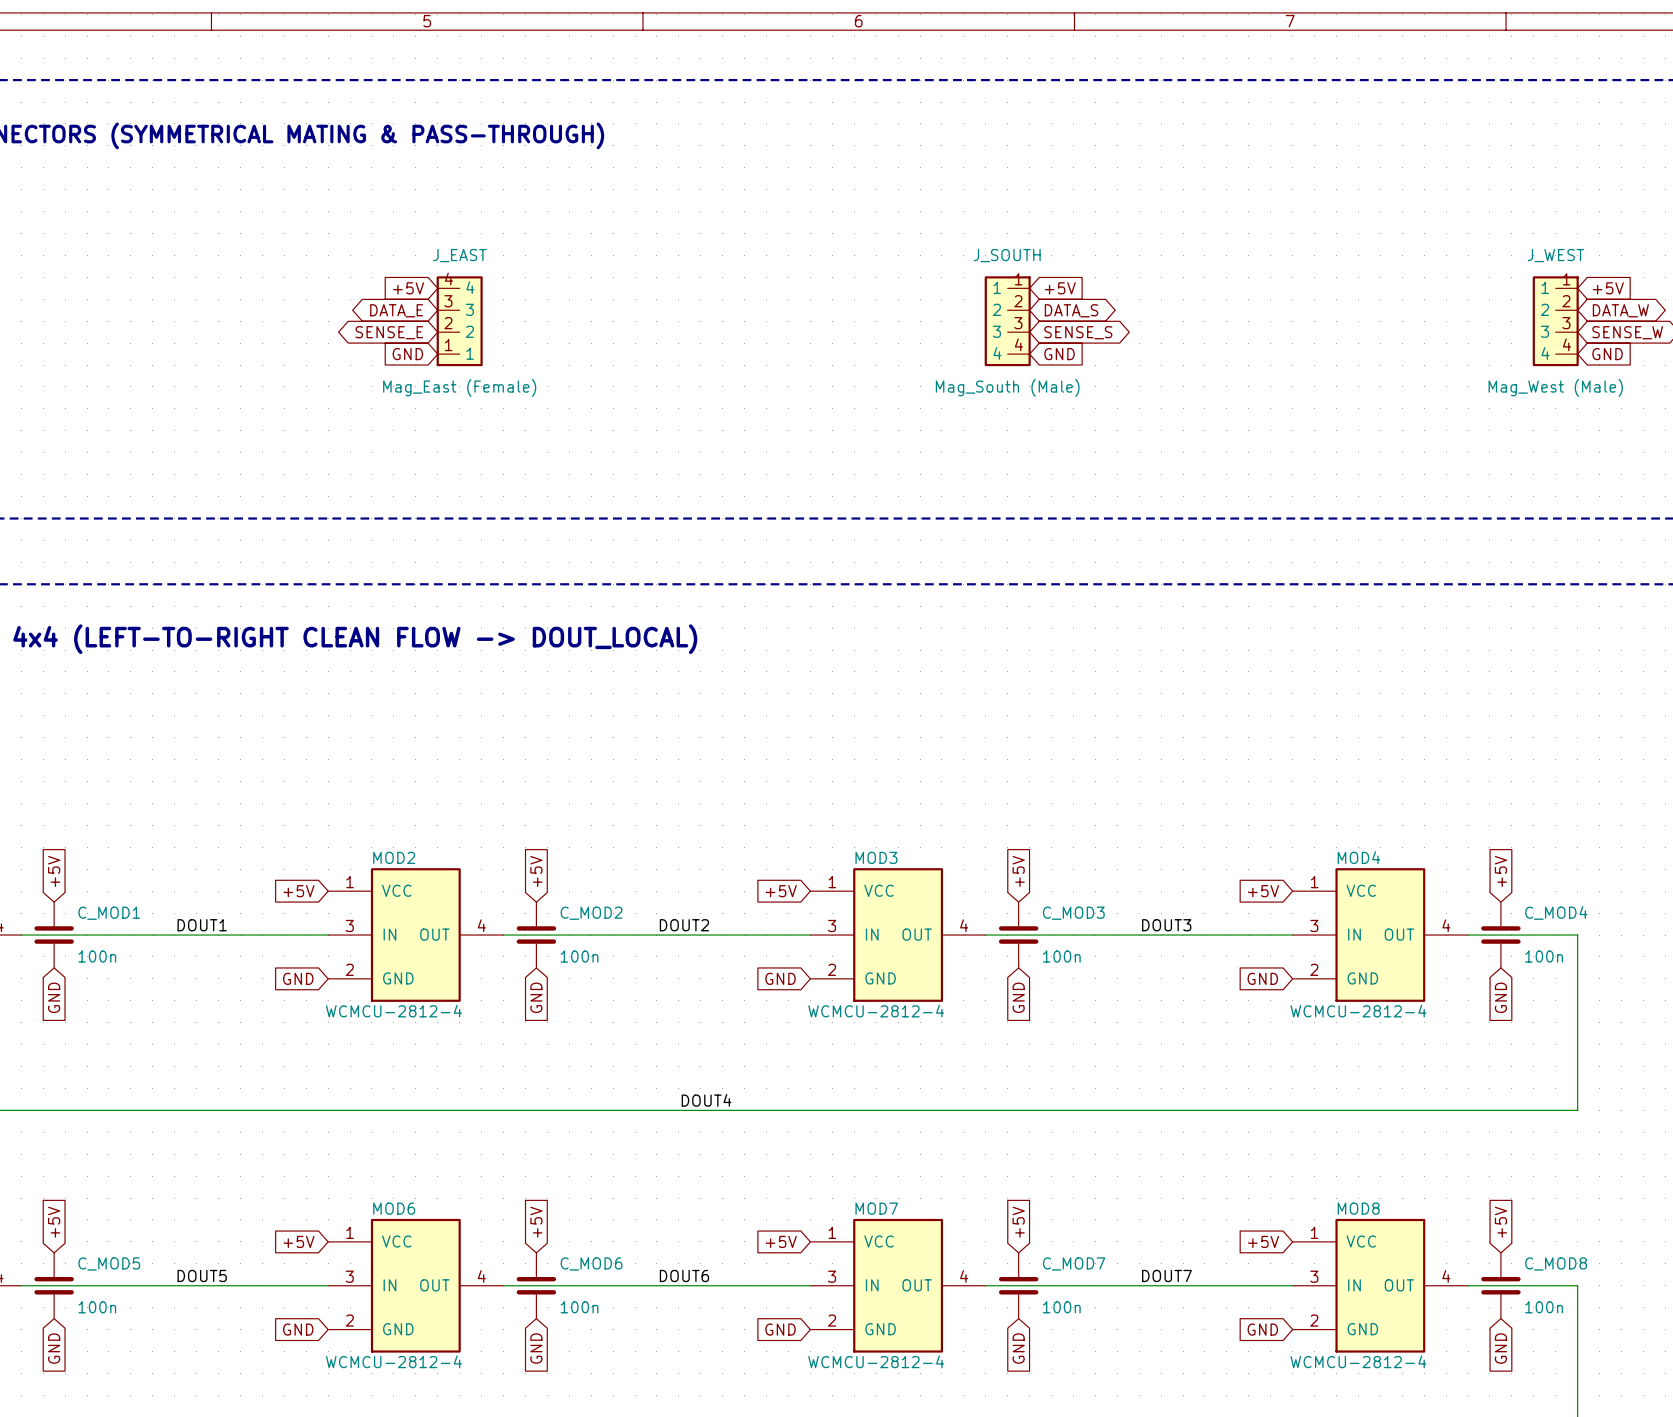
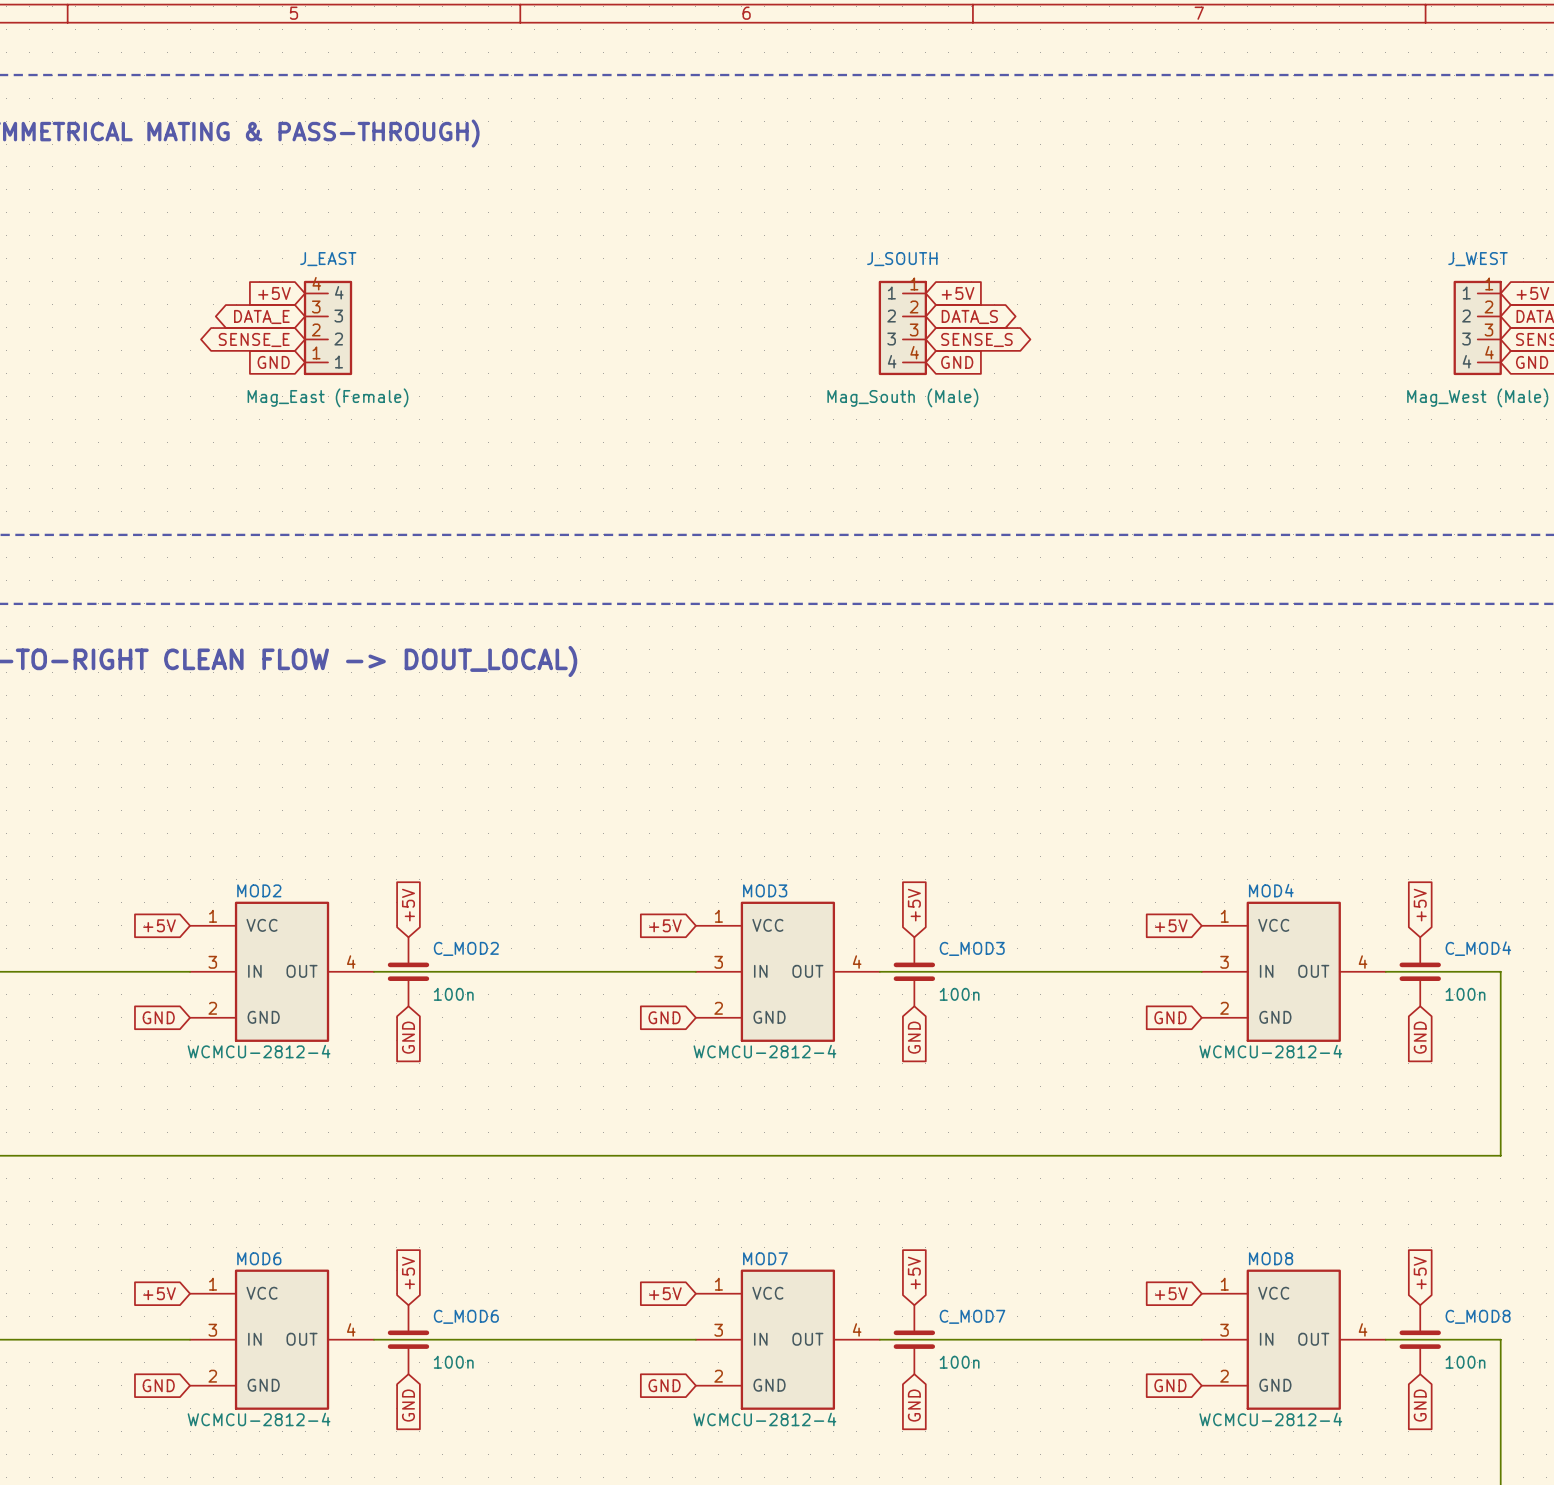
label: DOUT1 (202, 925) -> none
label: DOUT2 (684, 925) -> none
label: DOUT3 (1166, 925) -> none
label: DOUT4 (706, 1100) -> none
label: DOUT5 (202, 1275) -> none
label: DOUT6 (684, 1275) -> none
label: DOUT7 (1166, 1275) -> none

